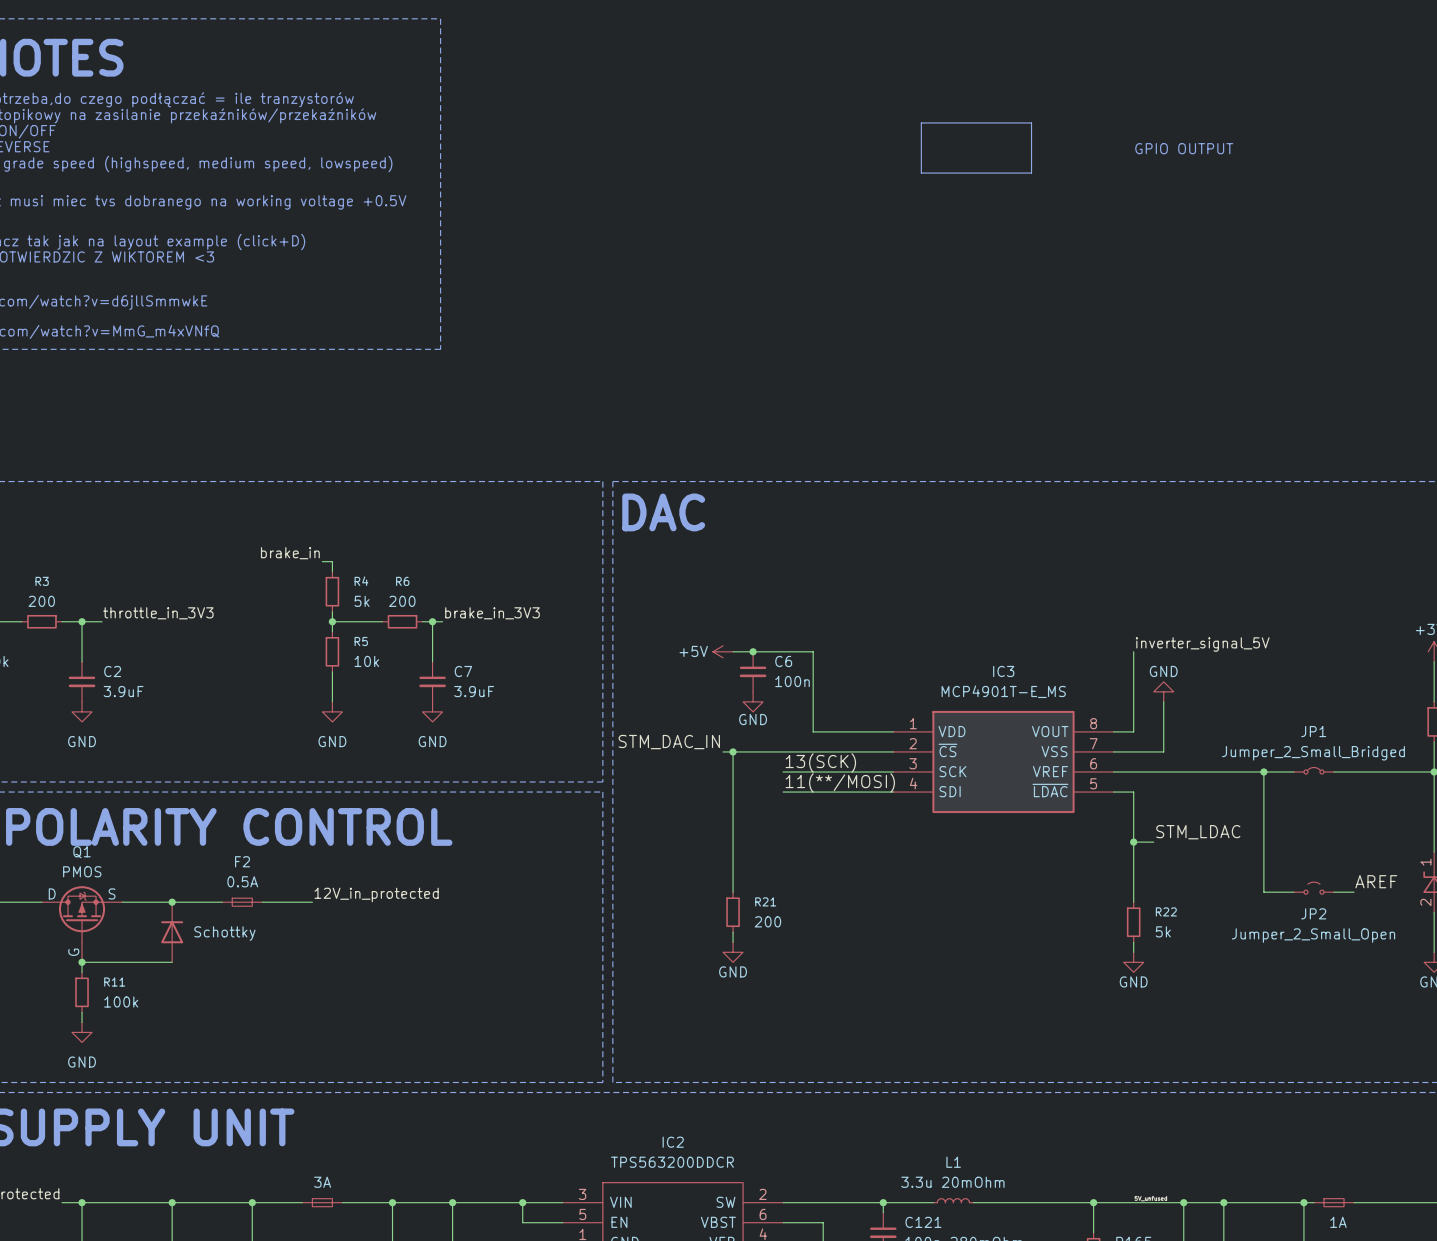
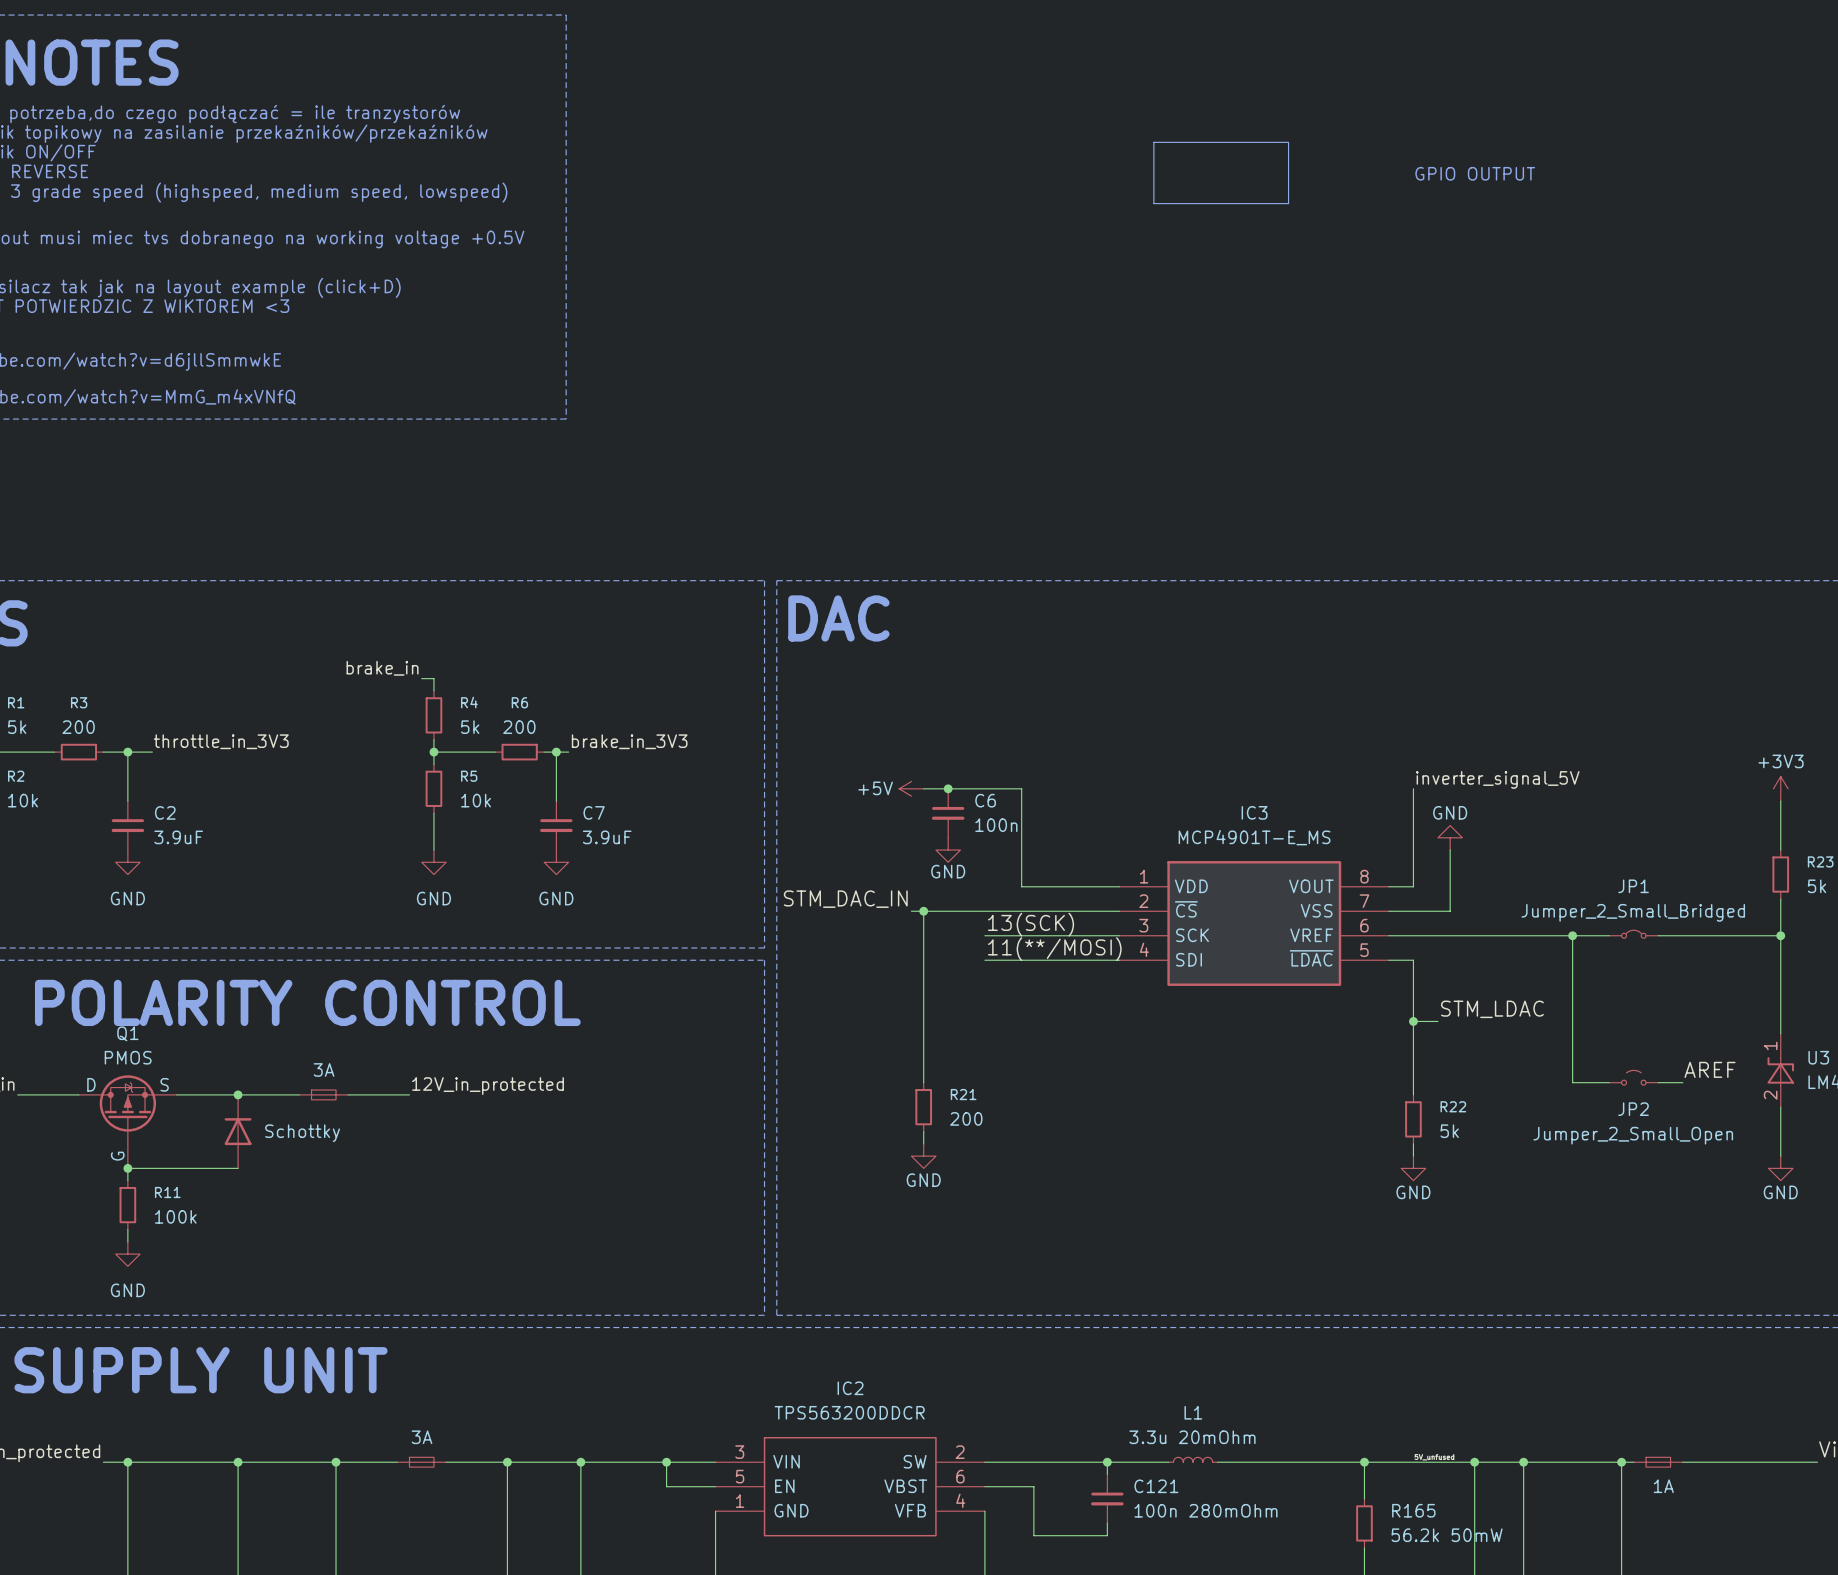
F2 name: F2 (242, 861) -> none
F2 value: 0.5A (242, 881) -> 3A (324, 1069)

